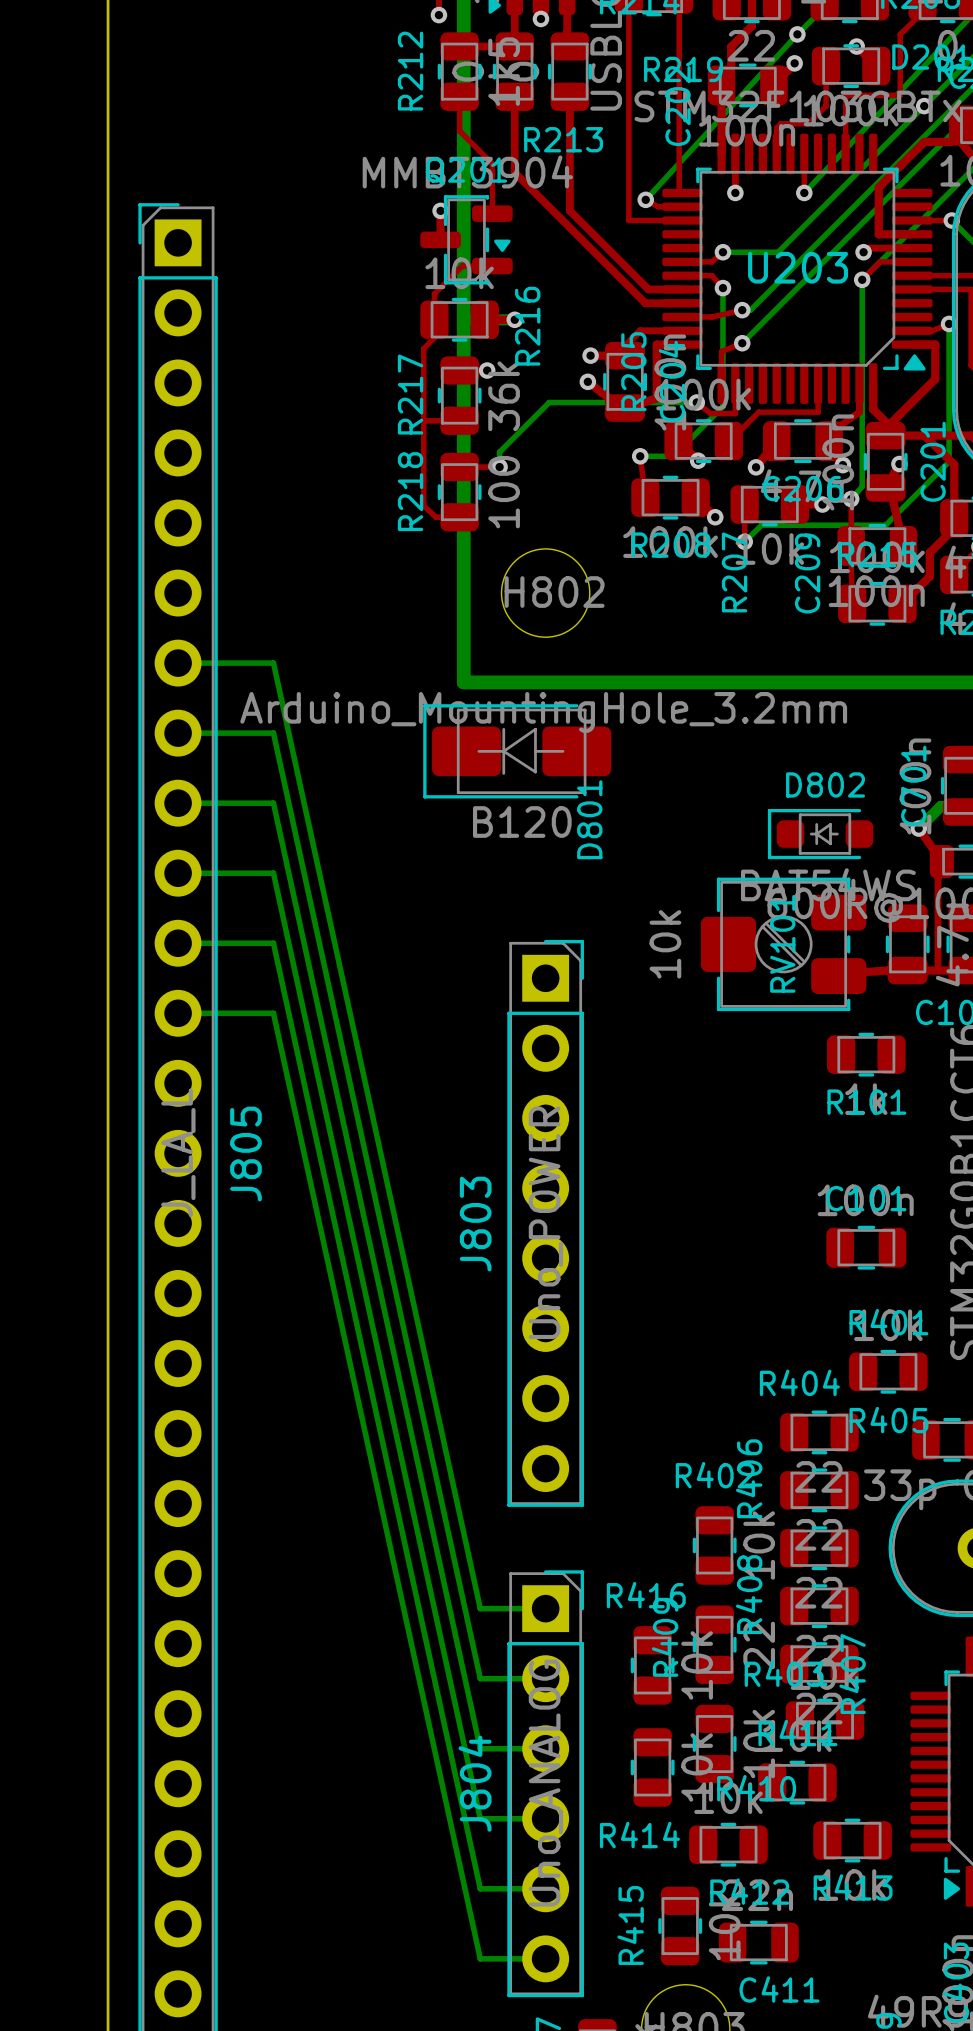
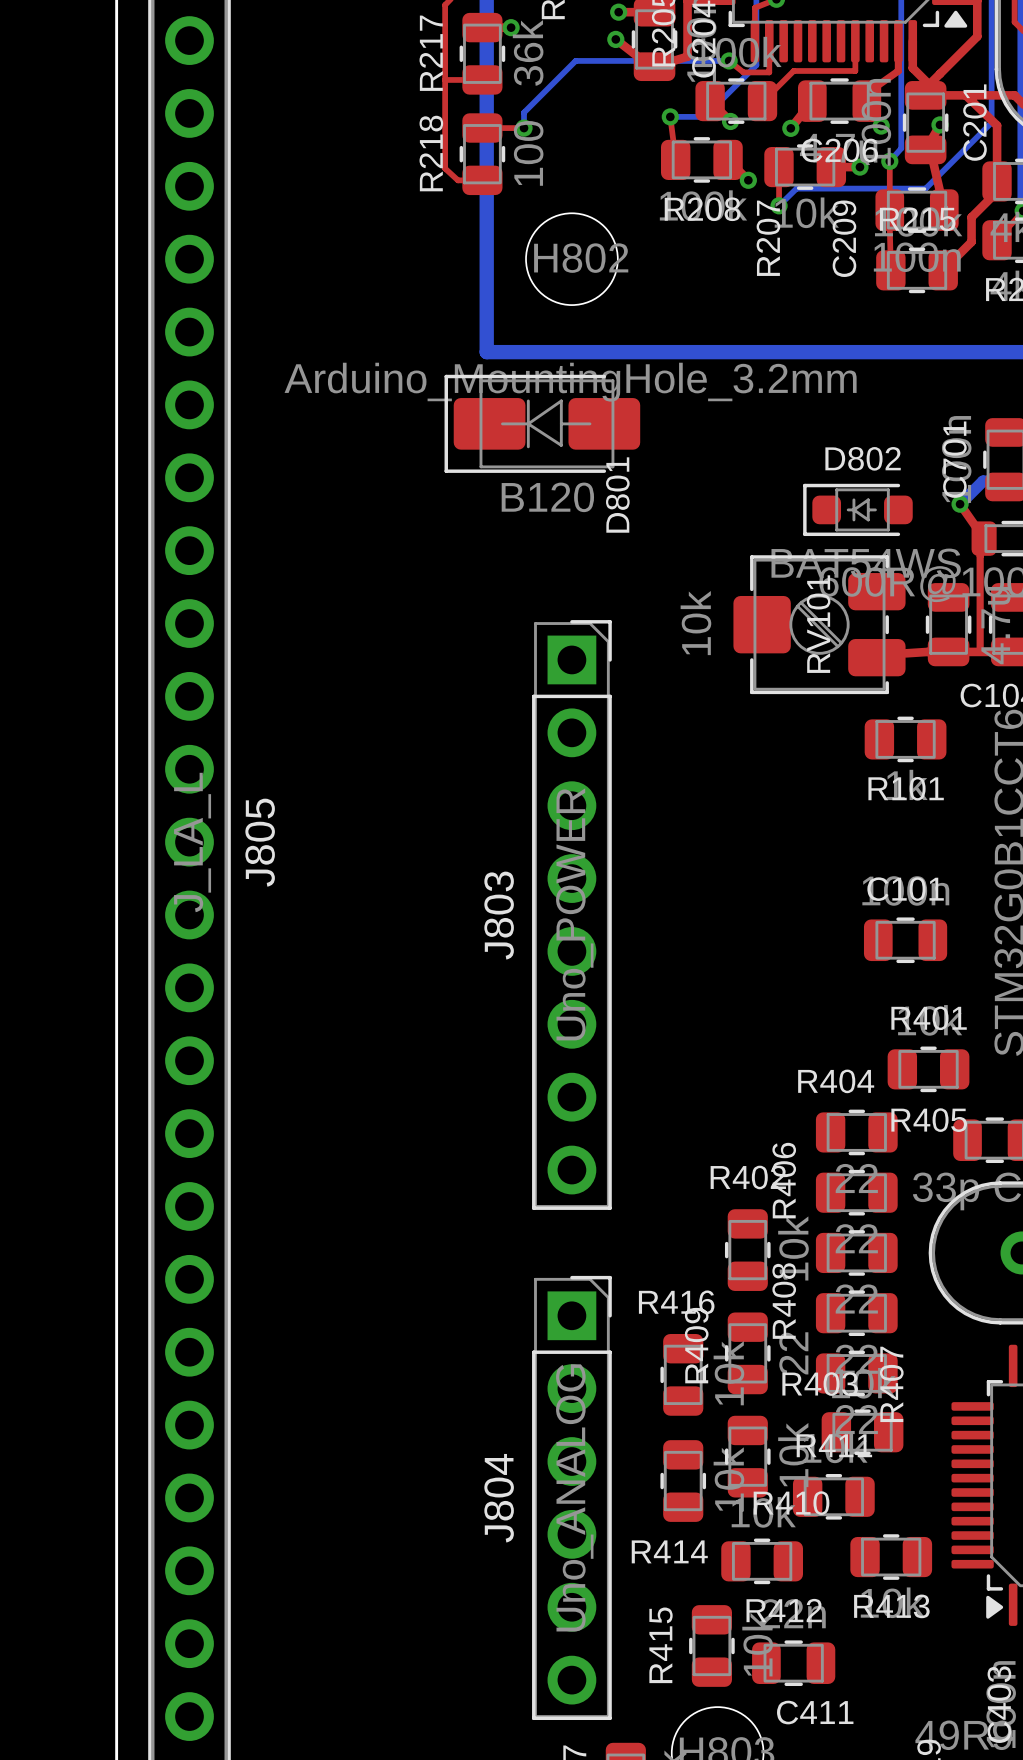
bottom track: (178, 663) (273, 663) (480, 1608) (545, 1608) -> none
bottom track: (178, 733) (273, 733) (480, 1678) (545, 1678) -> none
bottom track: (178, 803) (273, 803) (480, 1748) (545, 1748) -> none
bottom track: (178, 873) (273, 873) (480, 1818) (545, 1818) -> none
bottom track: (178, 943) (273, 943) (480, 1888) (545, 1888) -> none
bottom track: (178, 1013) (273, 1013) (480, 1958) (545, 1958) -> none

